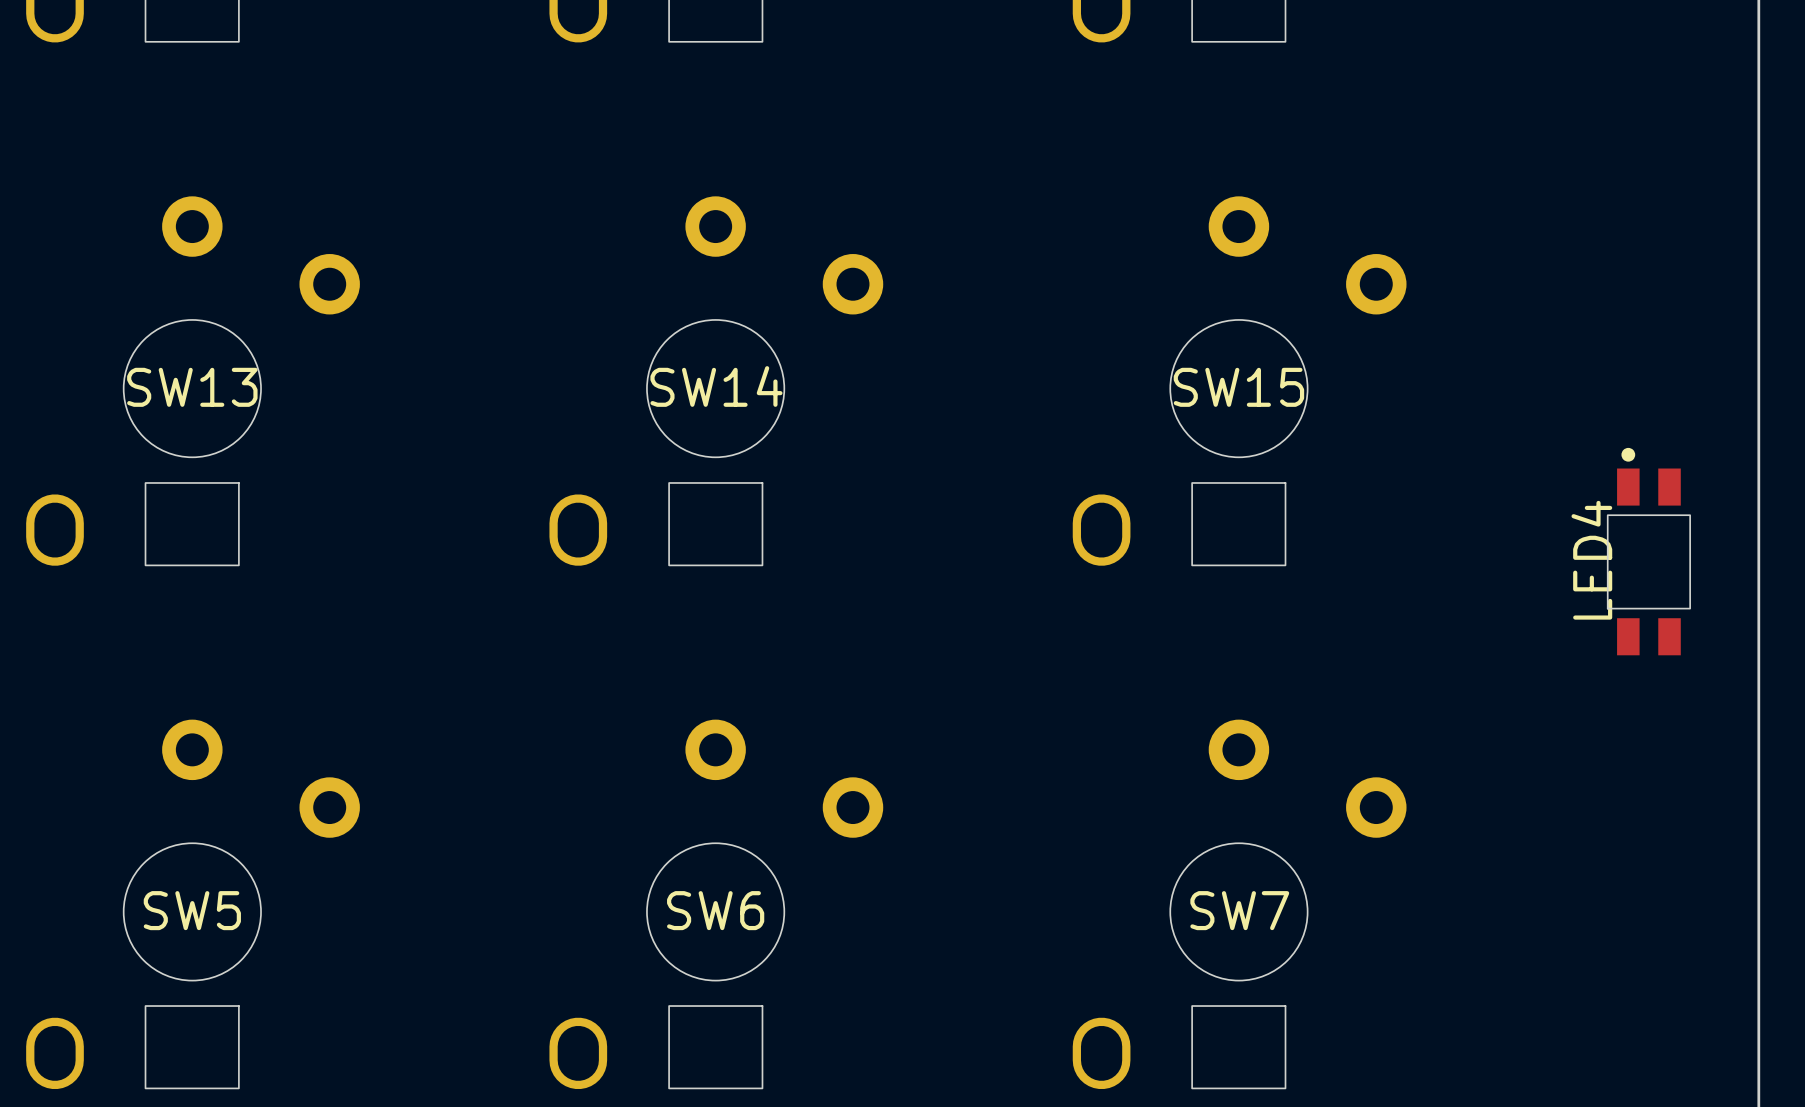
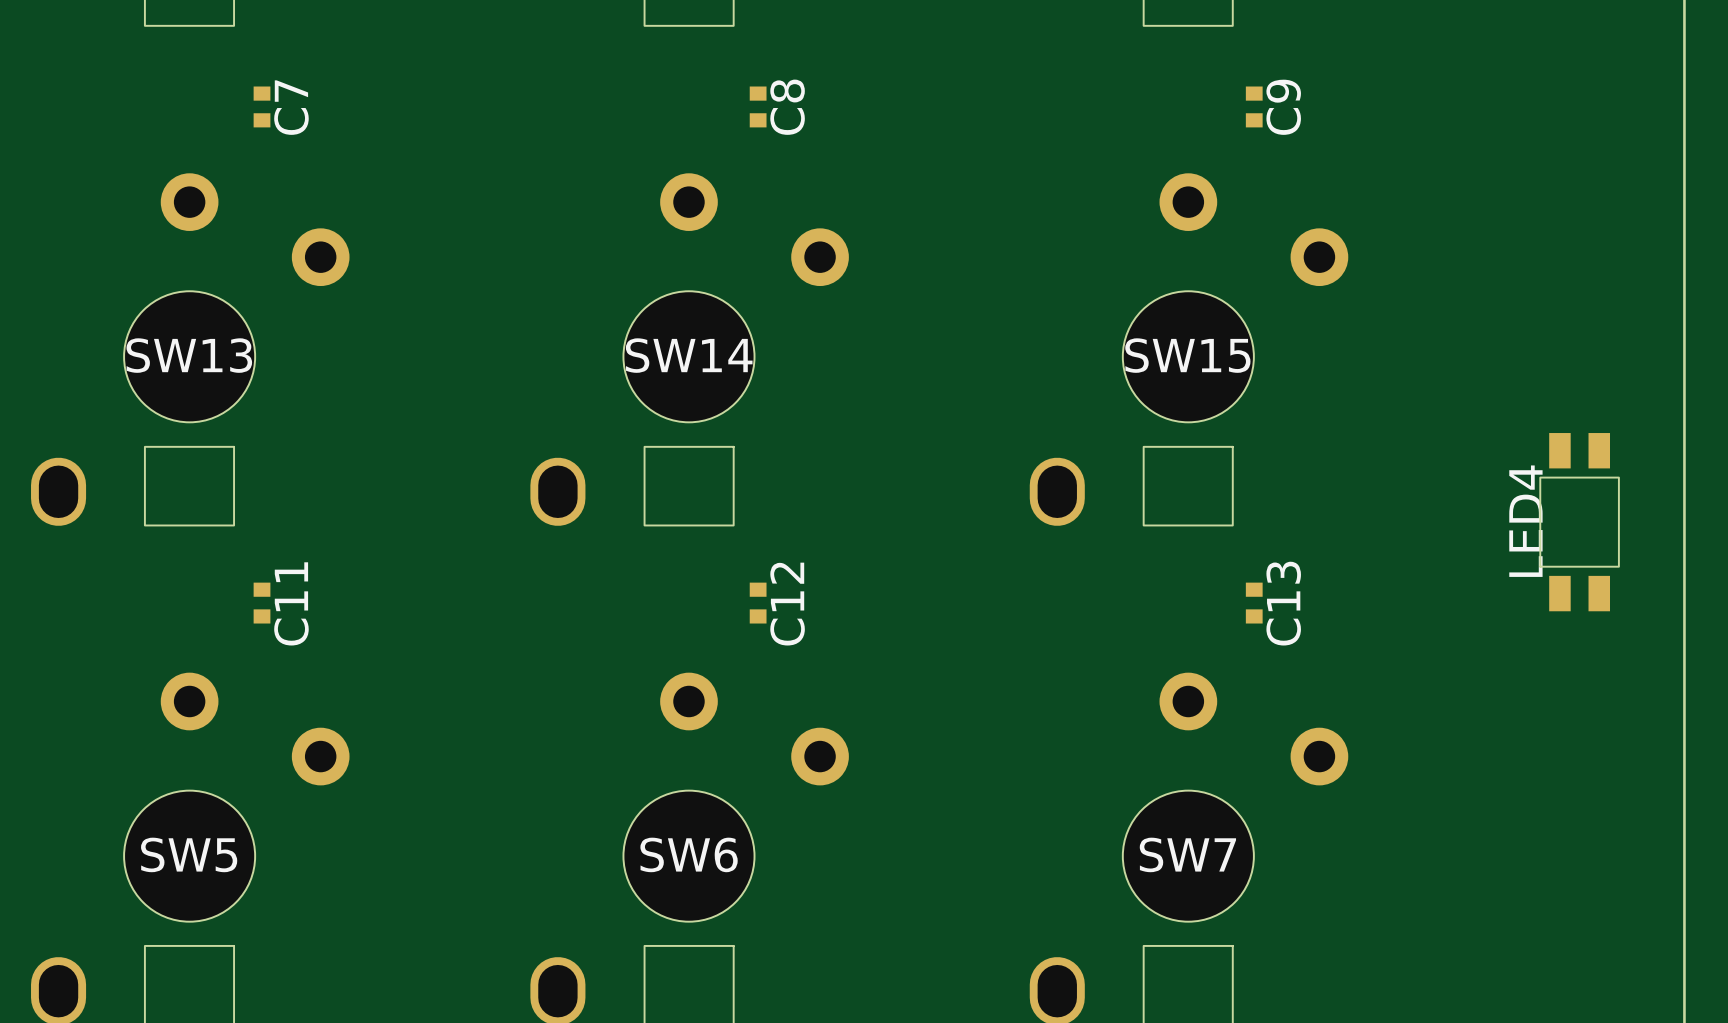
C7: none -> (262, 106)
C8: none -> (758, 106)
C9: none -> (1254, 106)
LED4 footprint: [1607, 447, 1691, 656] -> [1539, 433, 1620, 612]
C11: none -> (262, 603)
C12: none -> (758, 603)
C13: none -> (1254, 603)

